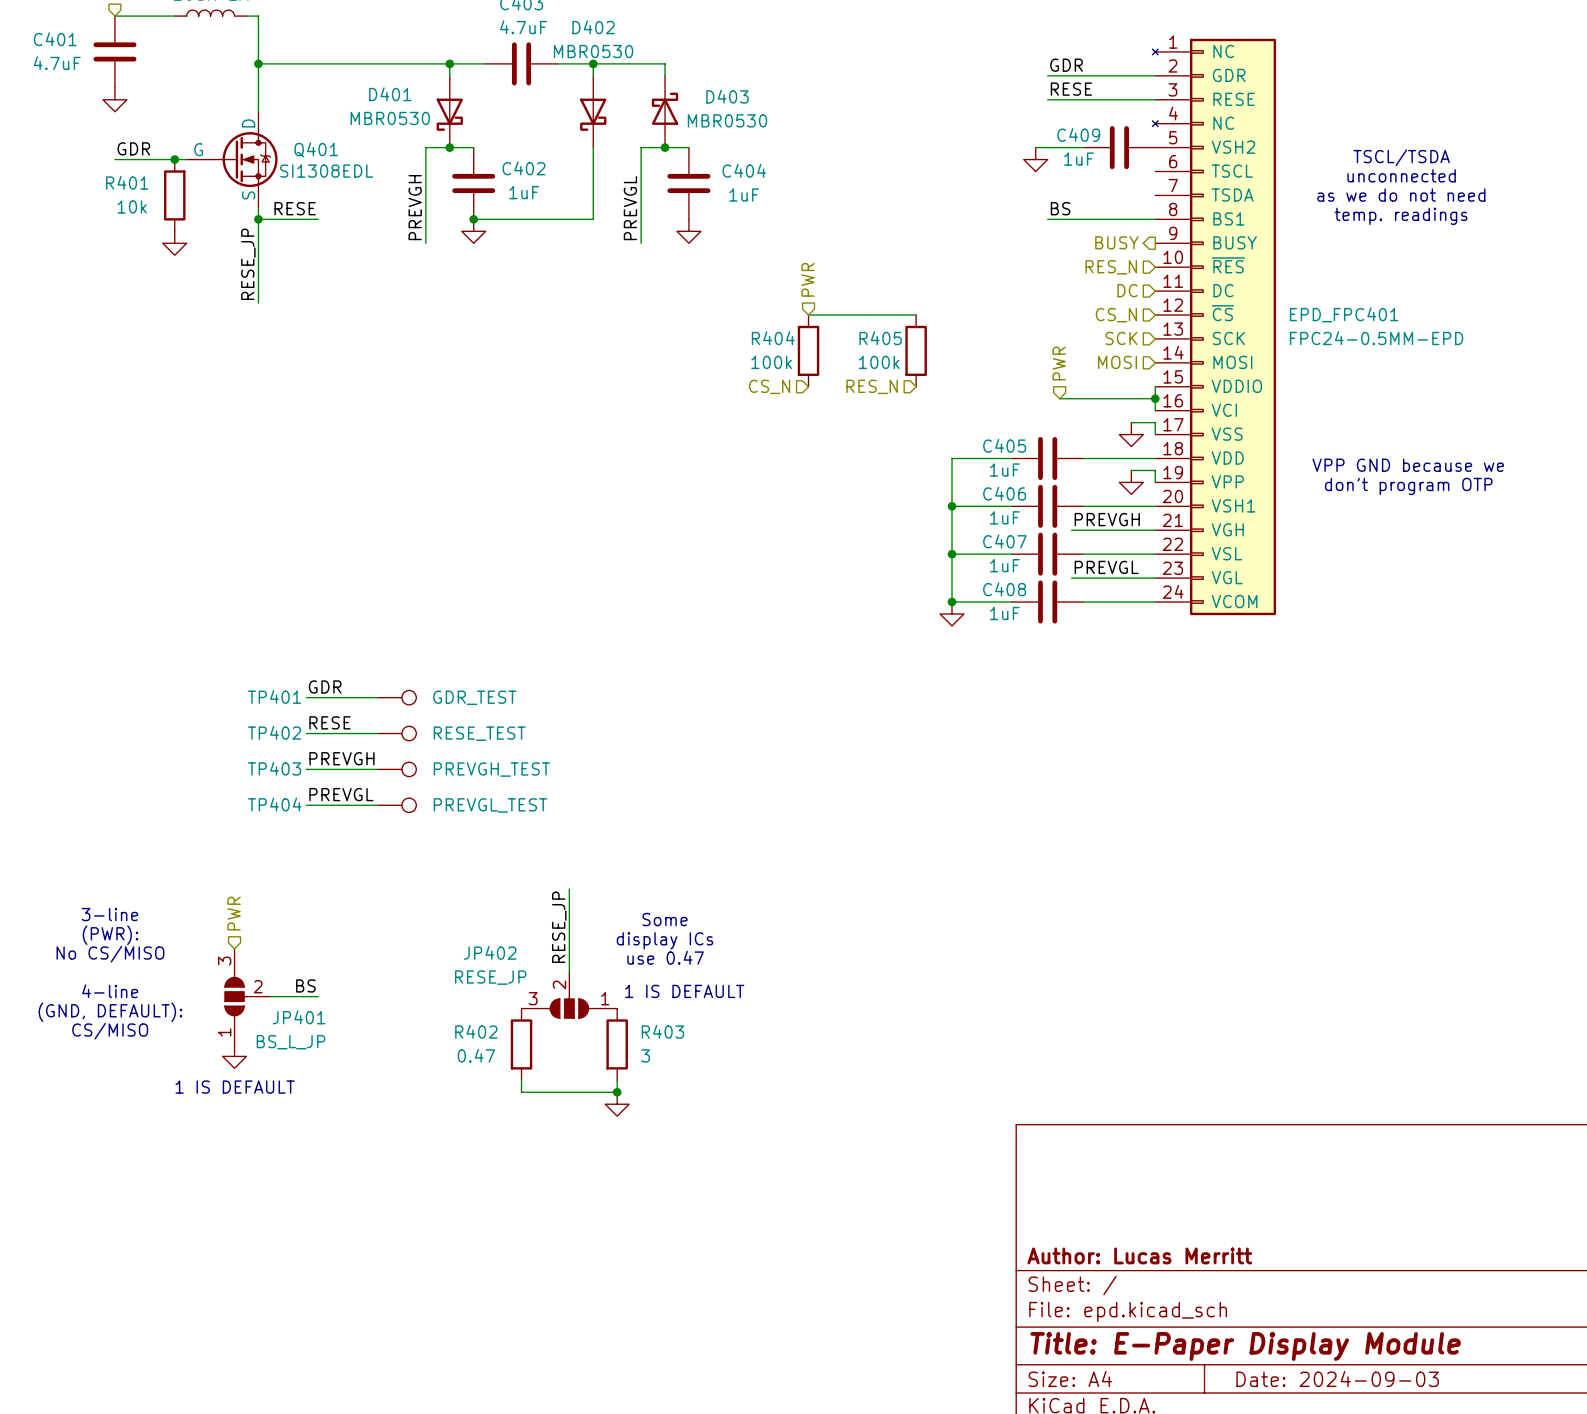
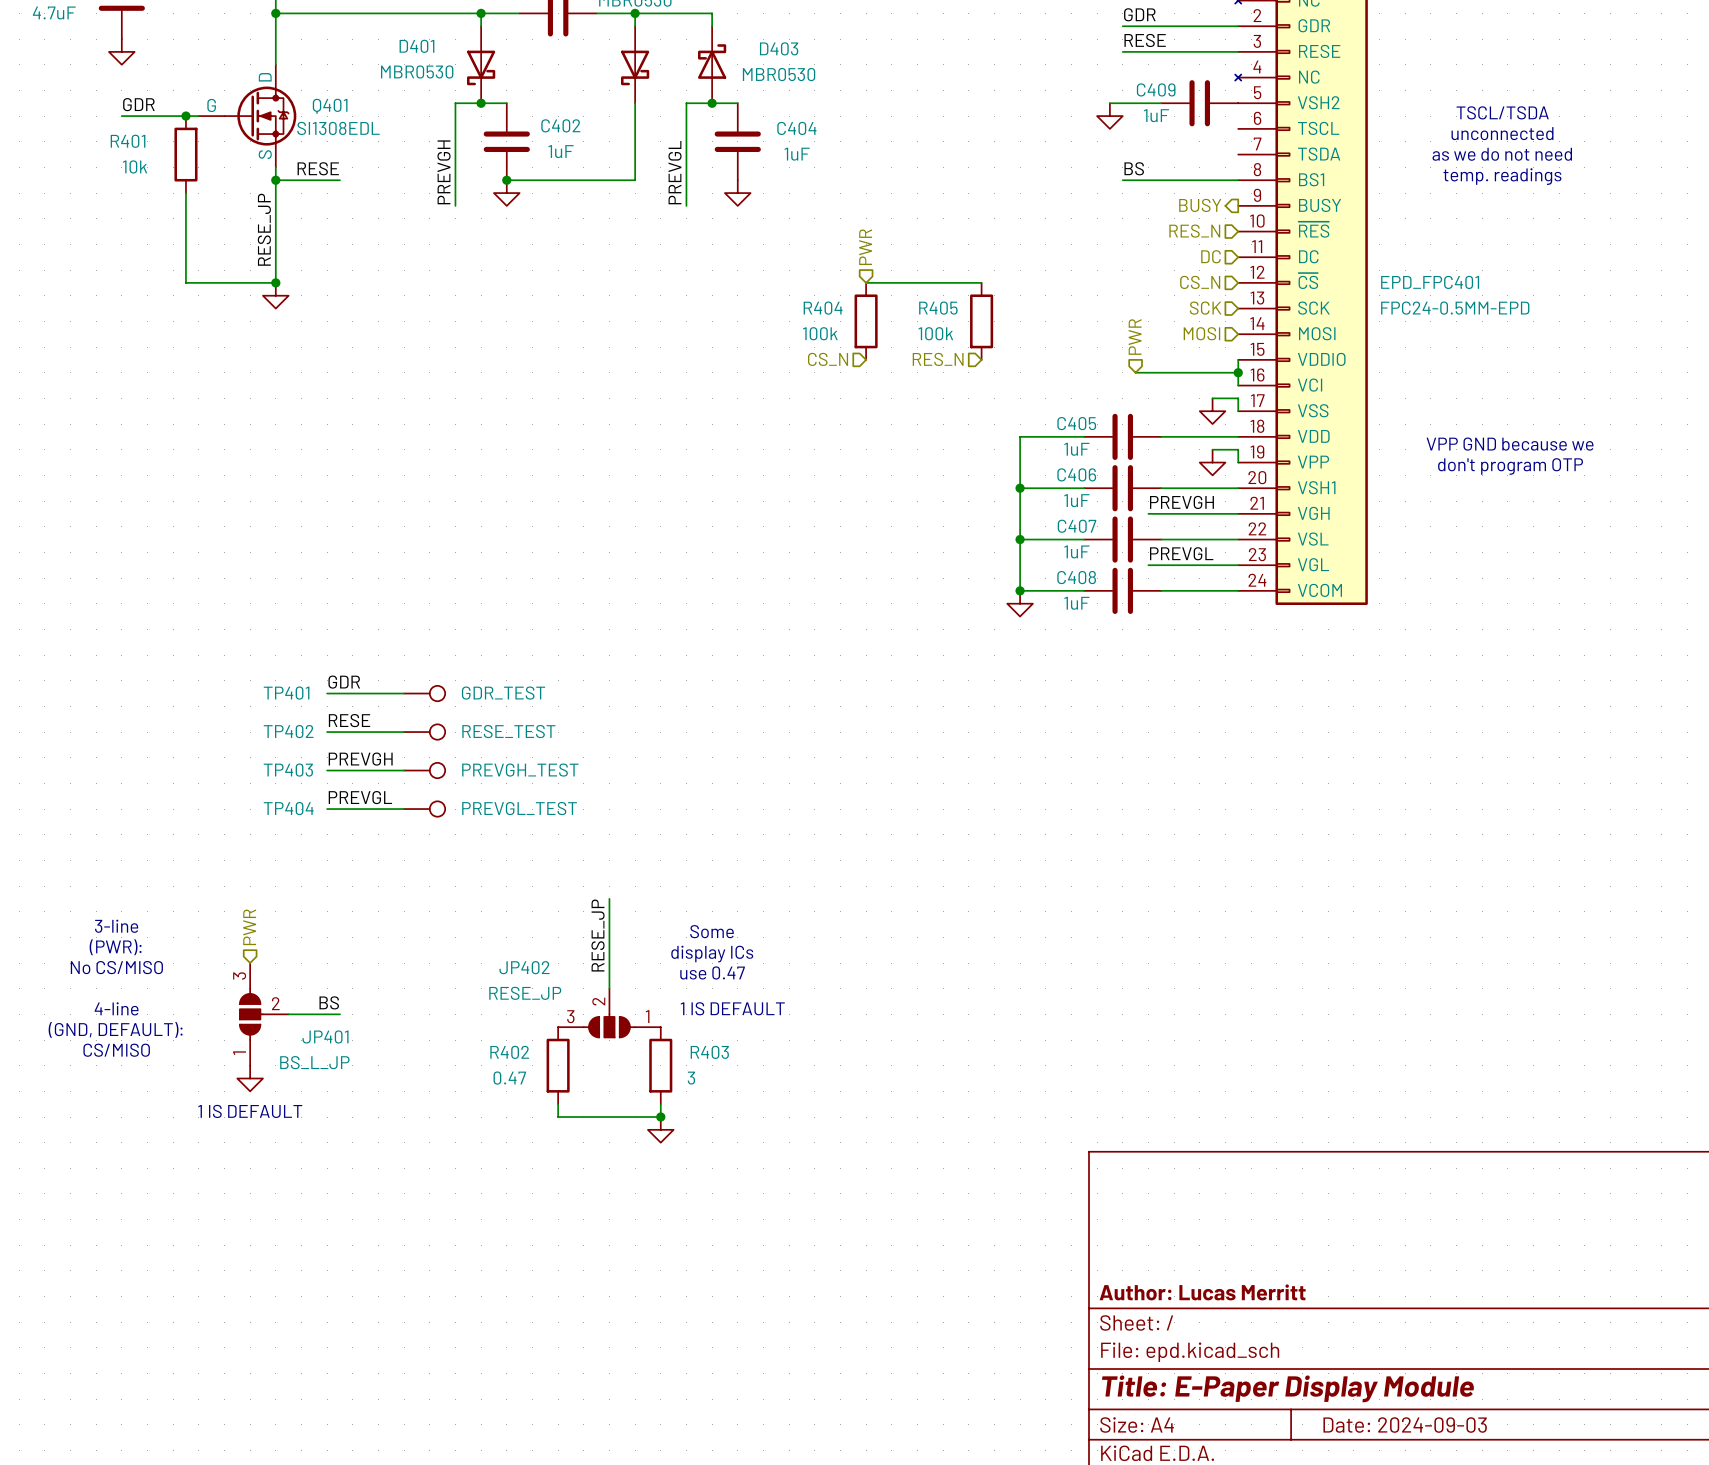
wire: none -> (185, 193) (185, 282) (275, 282) (275, 270)
power symbol position: (174, 243) -> (275, 295)
label position: RESE_JP (248, 264) -> RESE_JP (264, 229)
junction: none -> (275, 282)

